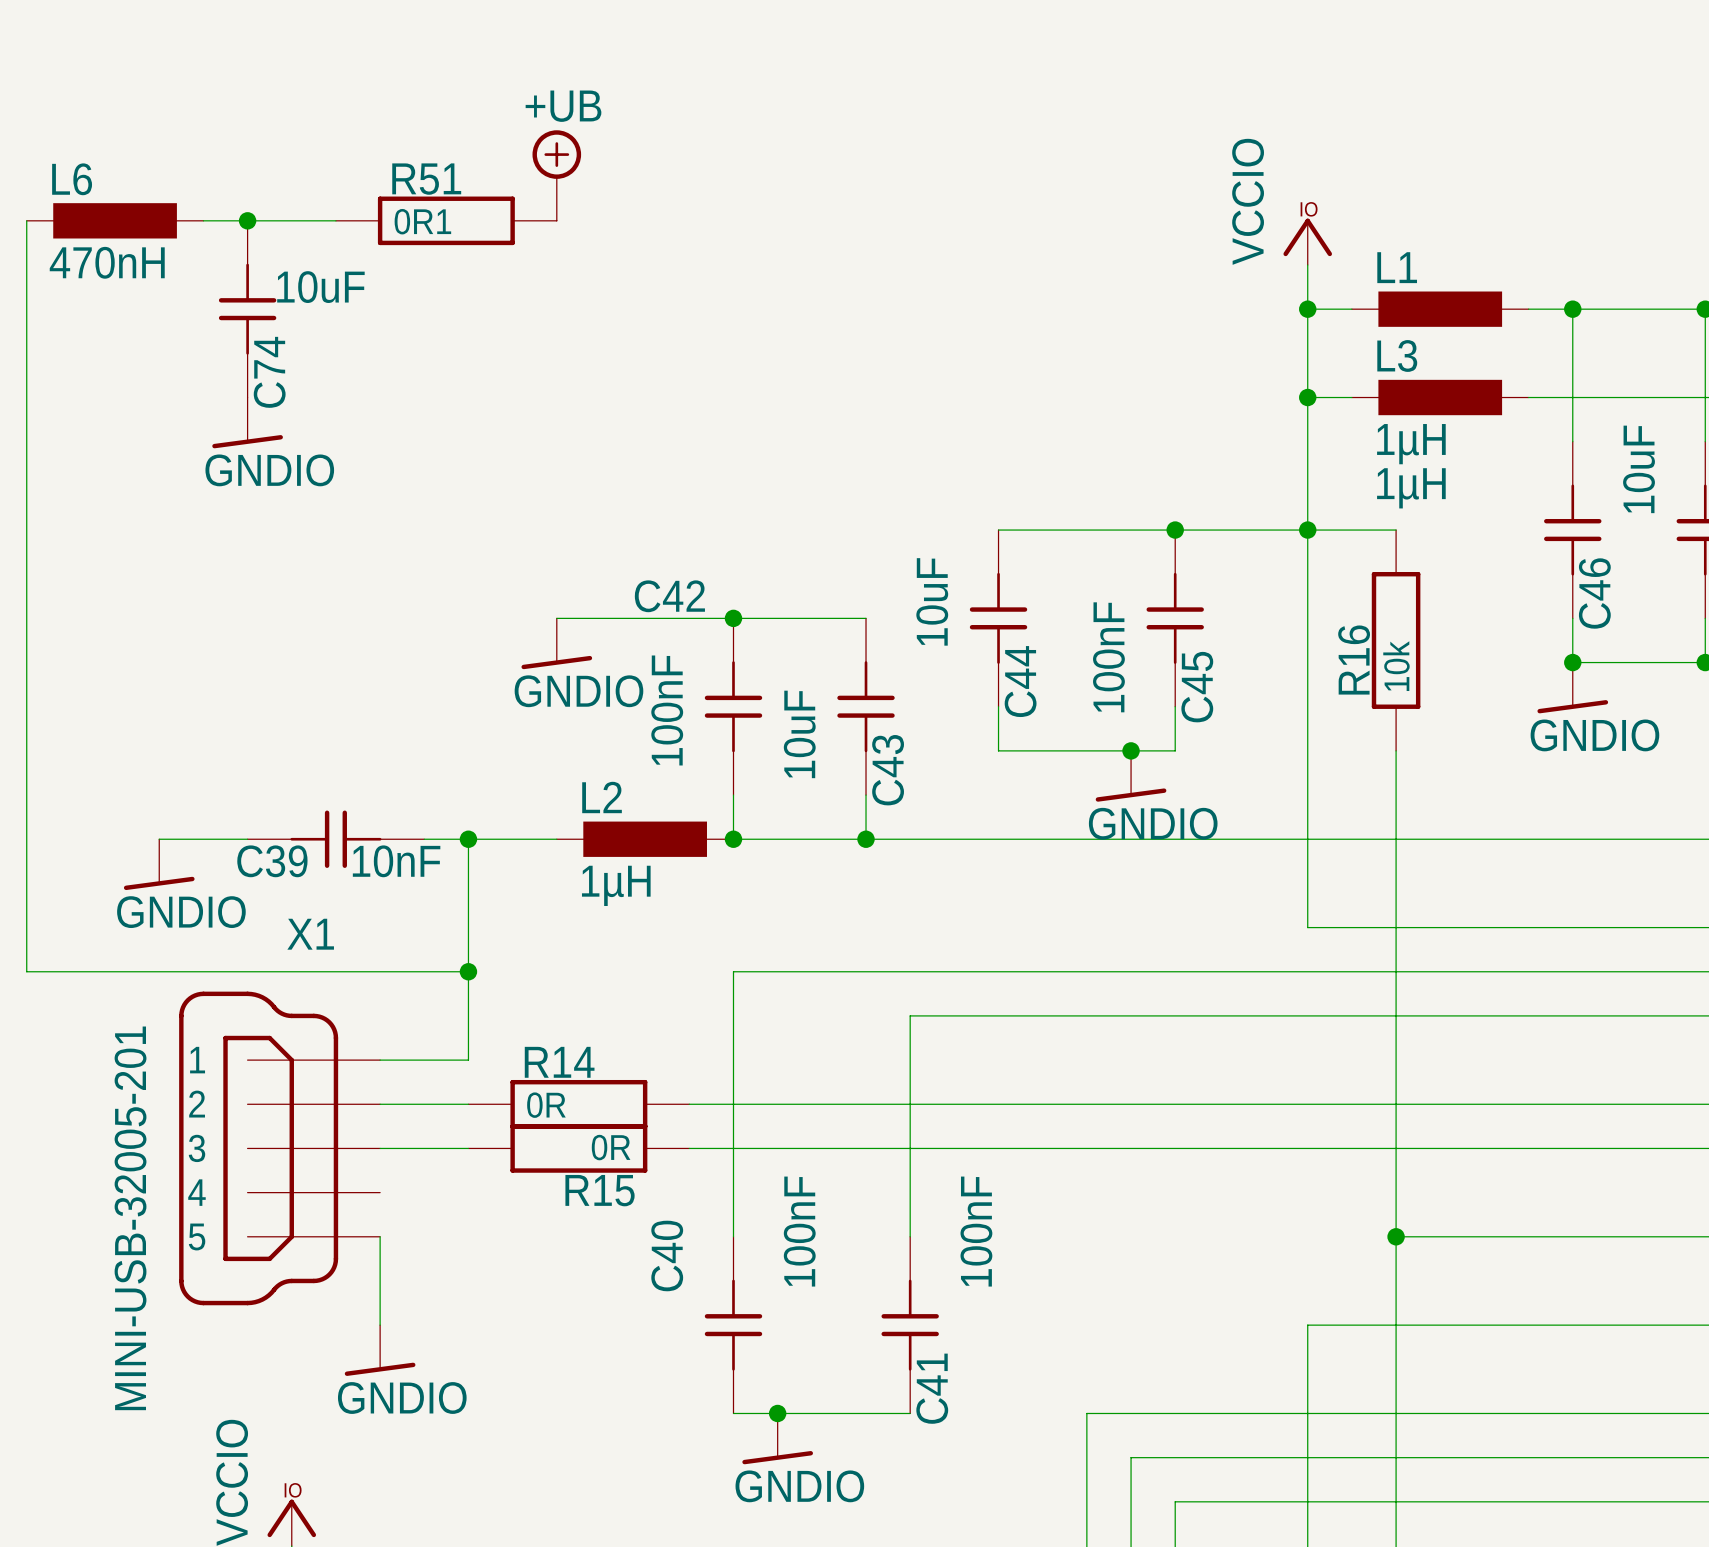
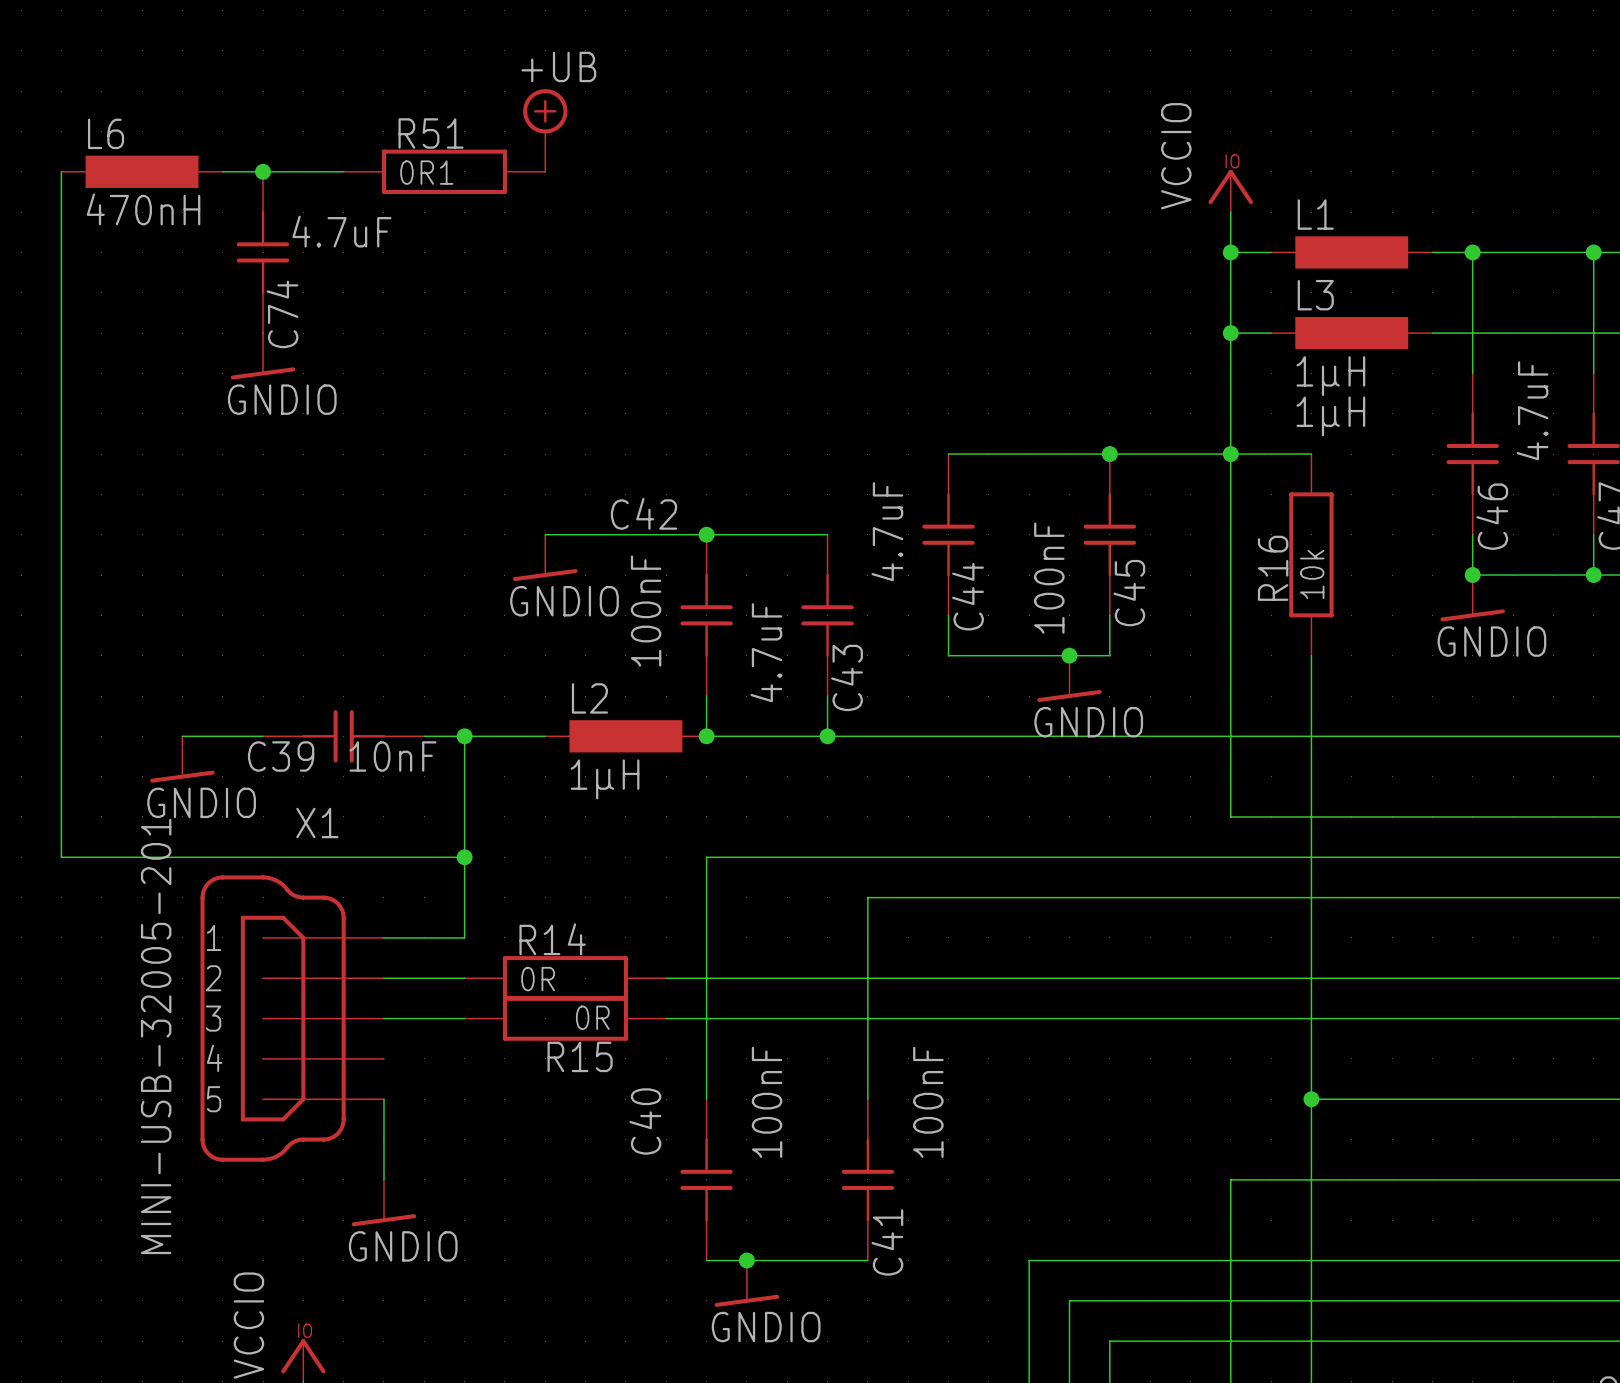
C74 value: 10uF (320, 287) -> 4.7uF (341, 231)
C46 value: 10uF (1639, 469) -> 4.7uF (1532, 410)
C44 value: 10uF (932, 601) -> 4.7uF (887, 531)
C43 value: 10uF (799, 734) -> 4.7uF (766, 652)

